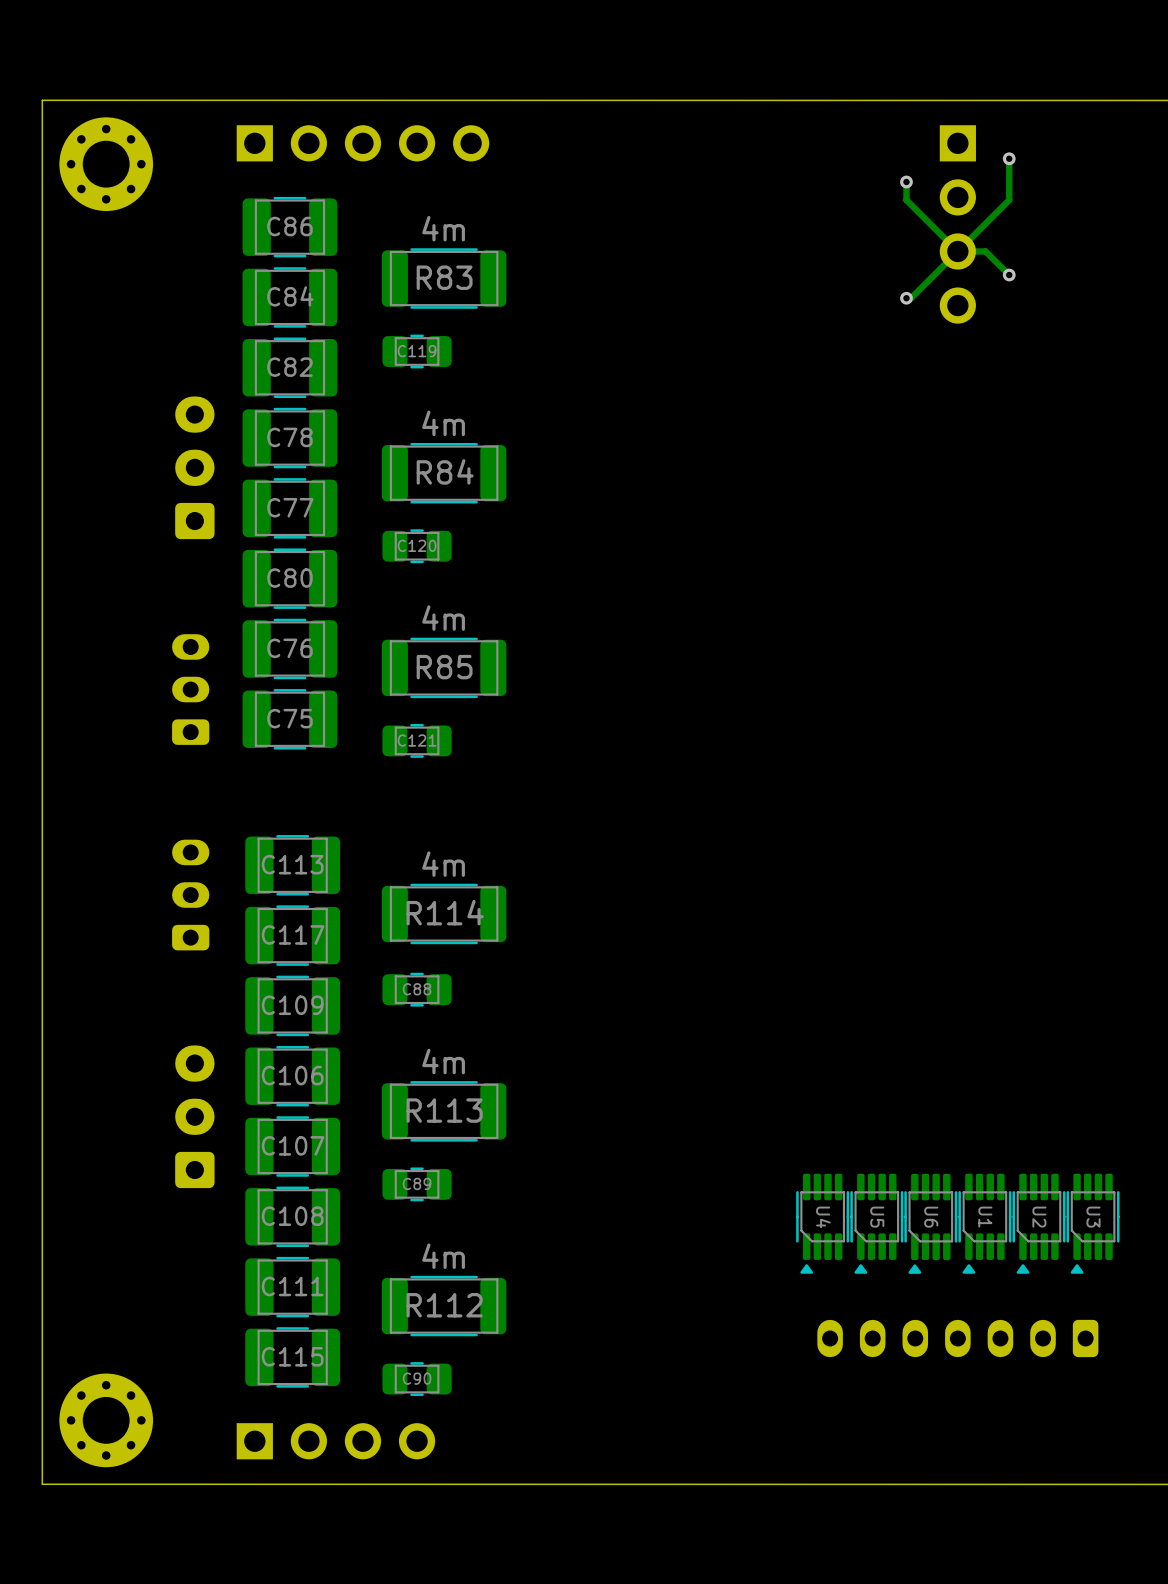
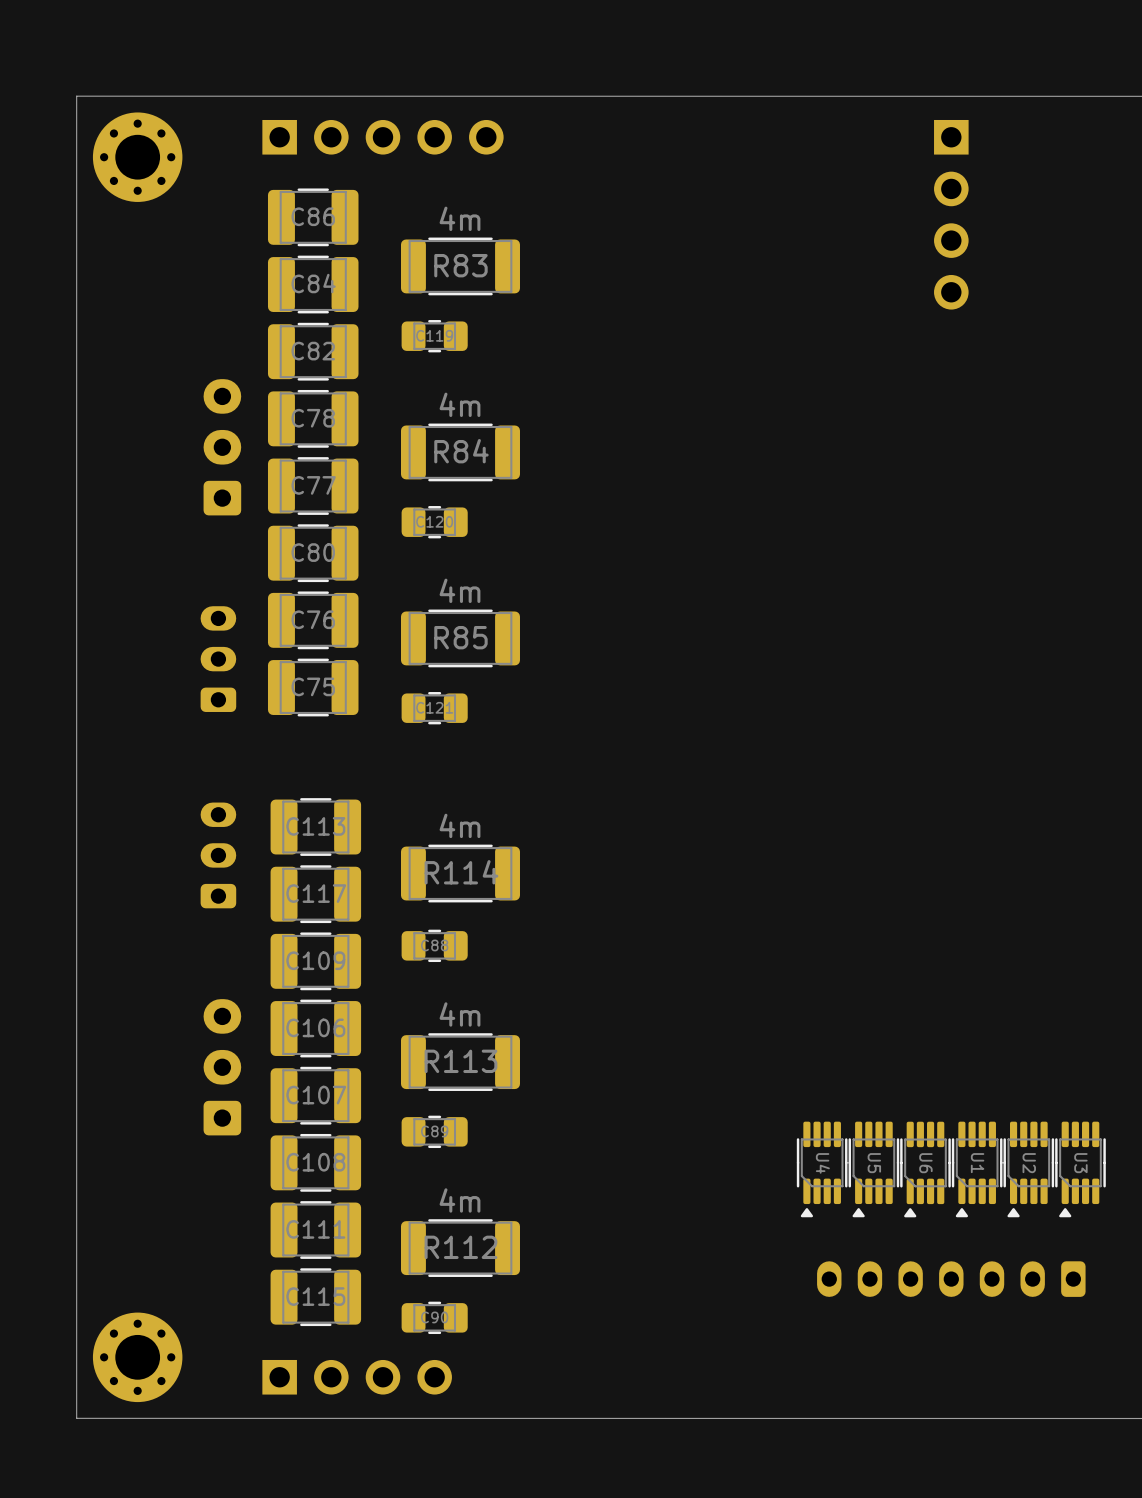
track: (1009, 158) (1009, 200) (911, 298) (906, 298) -> none
via: (1009, 158) -> none
track: (906, 181) (906, 200) (957, 251) (985, 251) (1009, 275) -> none
via: (906, 181) -> none
via: (1009, 275) -> none
via: (906, 298) -> none

